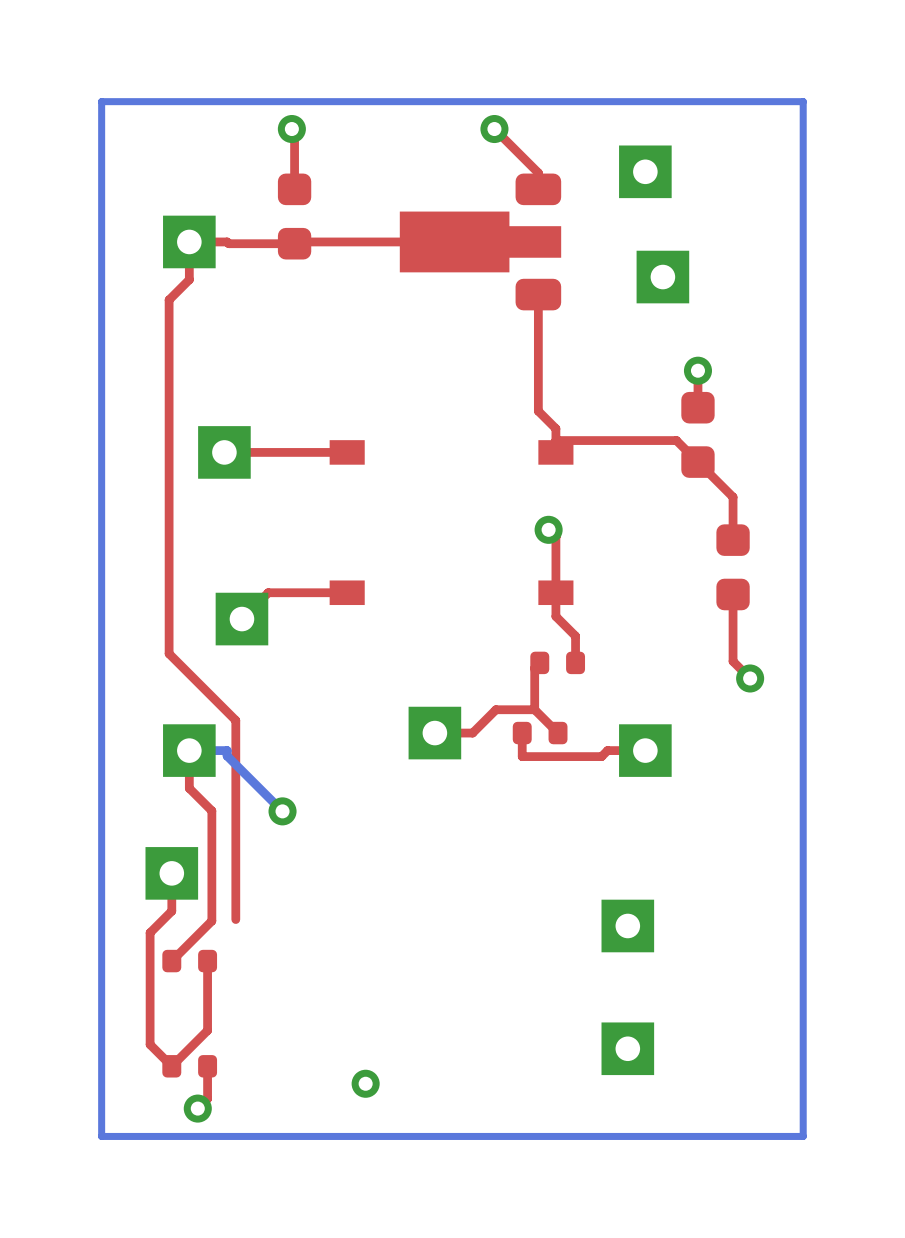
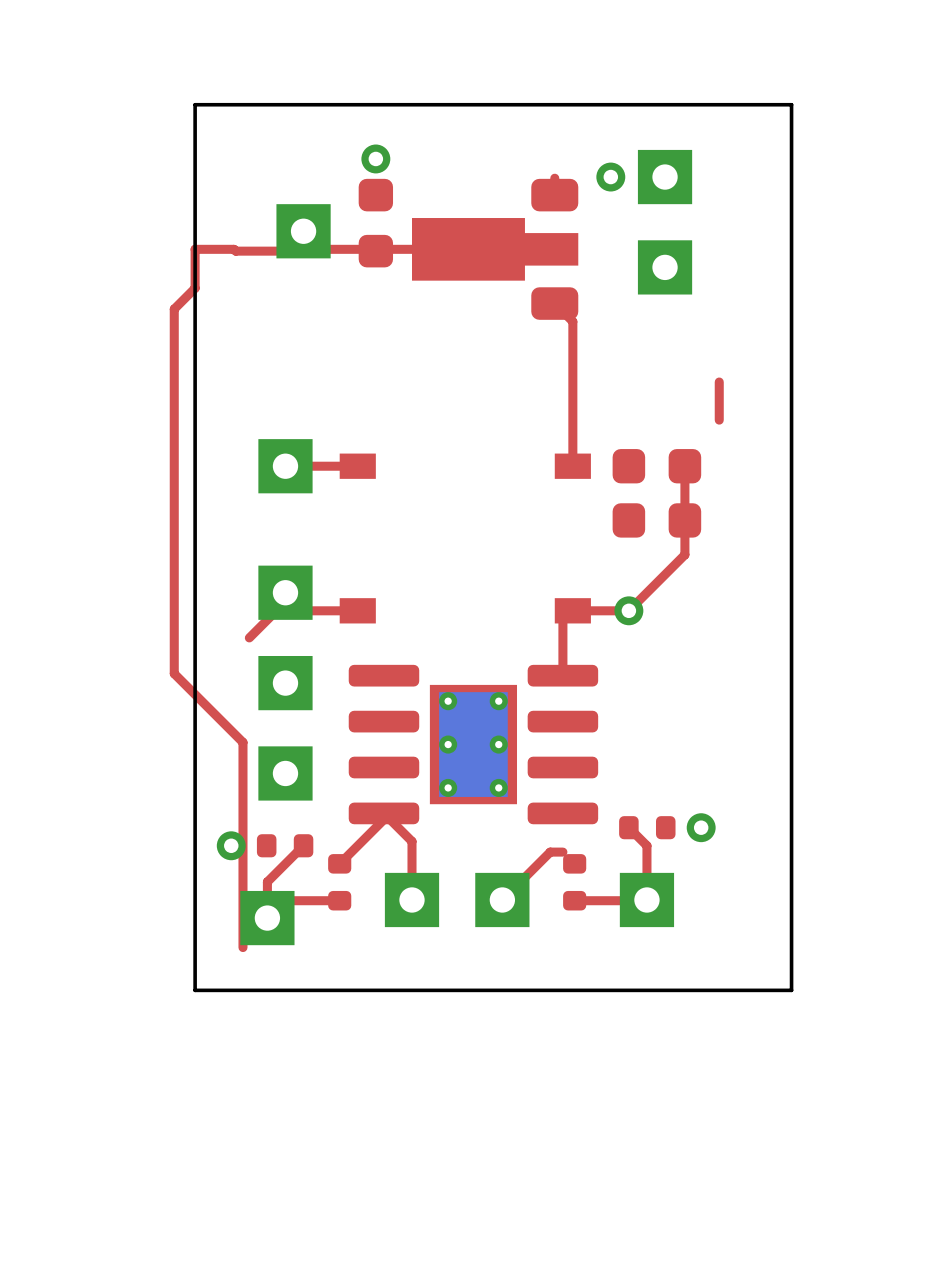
board edge: none -> (791, 104) (195, 104) (195, 990) (791, 990) (791, 104)
bottom track: (803, 101) (101, 101) (101, 1136) (803, 1136) (803, 101) -> none
top track: (291, 129) (294, 131) (294, 189) -> none
via: (291, 129) -> none
top track: (494, 129) (538, 172) -> none
via: (494, 129) -> none
via: none -> (375, 158)
via: none -> (610, 177)
part footprint: [277, 173, 312, 260] -> [276, 204, 331, 259]
part: none -> (375, 223)
part: (189, 241) -> none
part position: (662, 277) -> (665, 267)
top track: (538, 294) (538, 411) (555, 428) -> (554, 303) (572, 321) (572, 441)
via: (697, 370) -> none
part: (697, 434) -> none
top track: (555, 440) (676, 440) (733, 497) (733, 540) -> none
part position: (224, 452) -> (285, 466)
top track: (277, 452) (224, 452) -> none
part: none -> (656, 466)
top track: none -> (684, 466) (684, 554) (628, 610) (572, 610) (562, 620) (562, 675)
part: none -> (656, 520)
top track: (548, 529) (555, 537) (555, 616) (575, 636) (575, 662) -> none
via: (548, 529) -> none
part: (733, 567) -> none
part: none -> (285, 592)
via: none -> (628, 610)
top track: (733, 594) (733, 661) (750, 678) -> none
part: (241, 619) -> none
part: none -> (285, 683)
top track: (539, 662) (534, 667) (534, 709) -> none
part: (557, 662) -> none
via: (750, 678) -> none
part footprint: [408, 706, 462, 760] -> [348, 664, 599, 825]
top track: (534, 709) (558, 733) -> none
top track: (534, 709) (495, 709) (472, 733) (434, 733) -> none
top track: (522, 733) (522, 756) (601, 756) (607, 750) (645, 750) -> none
part: (540, 733) -> none
bottom track: (189, 750) (227, 750) (227, 755) (282, 811) -> none
top track: (189, 750) (189, 788) (211, 810) (211, 921) (171, 961) -> none
part: (189, 750) -> none
part: none -> (285, 773)
part: (645, 750) -> none
top track: none -> (628, 827) (646, 845) (646, 899)
part: none -> (647, 827)
via: none -> (701, 827)
via position: (282, 811) -> (231, 845)
part: none -> (285, 845)
top track: none -> (303, 845) (267, 881) (267, 918) (284, 900) (339, 900)
top track: none -> (562, 852) (550, 852) (502, 899)
top track: none -> (339, 863) (383, 819) (383, 813) (412, 841) (412, 899)
part: none -> (339, 882)
part: none -> (574, 882)
top track: (171, 873) (171, 911) (150, 932) (150, 1044) (171, 1066) (207, 1030) (207, 961) -> none
part: (171, 873) -> none
part: none -> (412, 899)
part: none -> (502, 899)
top track: none -> (646, 899) (574, 900)
part: none -> (267, 918)
part position: (627, 925) -> (646, 899)
part: (189, 961) -> none
part: (627, 1048) -> none
part: (189, 1066) -> none
top track: (207, 1066) (207, 1098) (197, 1108) -> none
via: (365, 1083) -> none
via: (197, 1108) -> none

